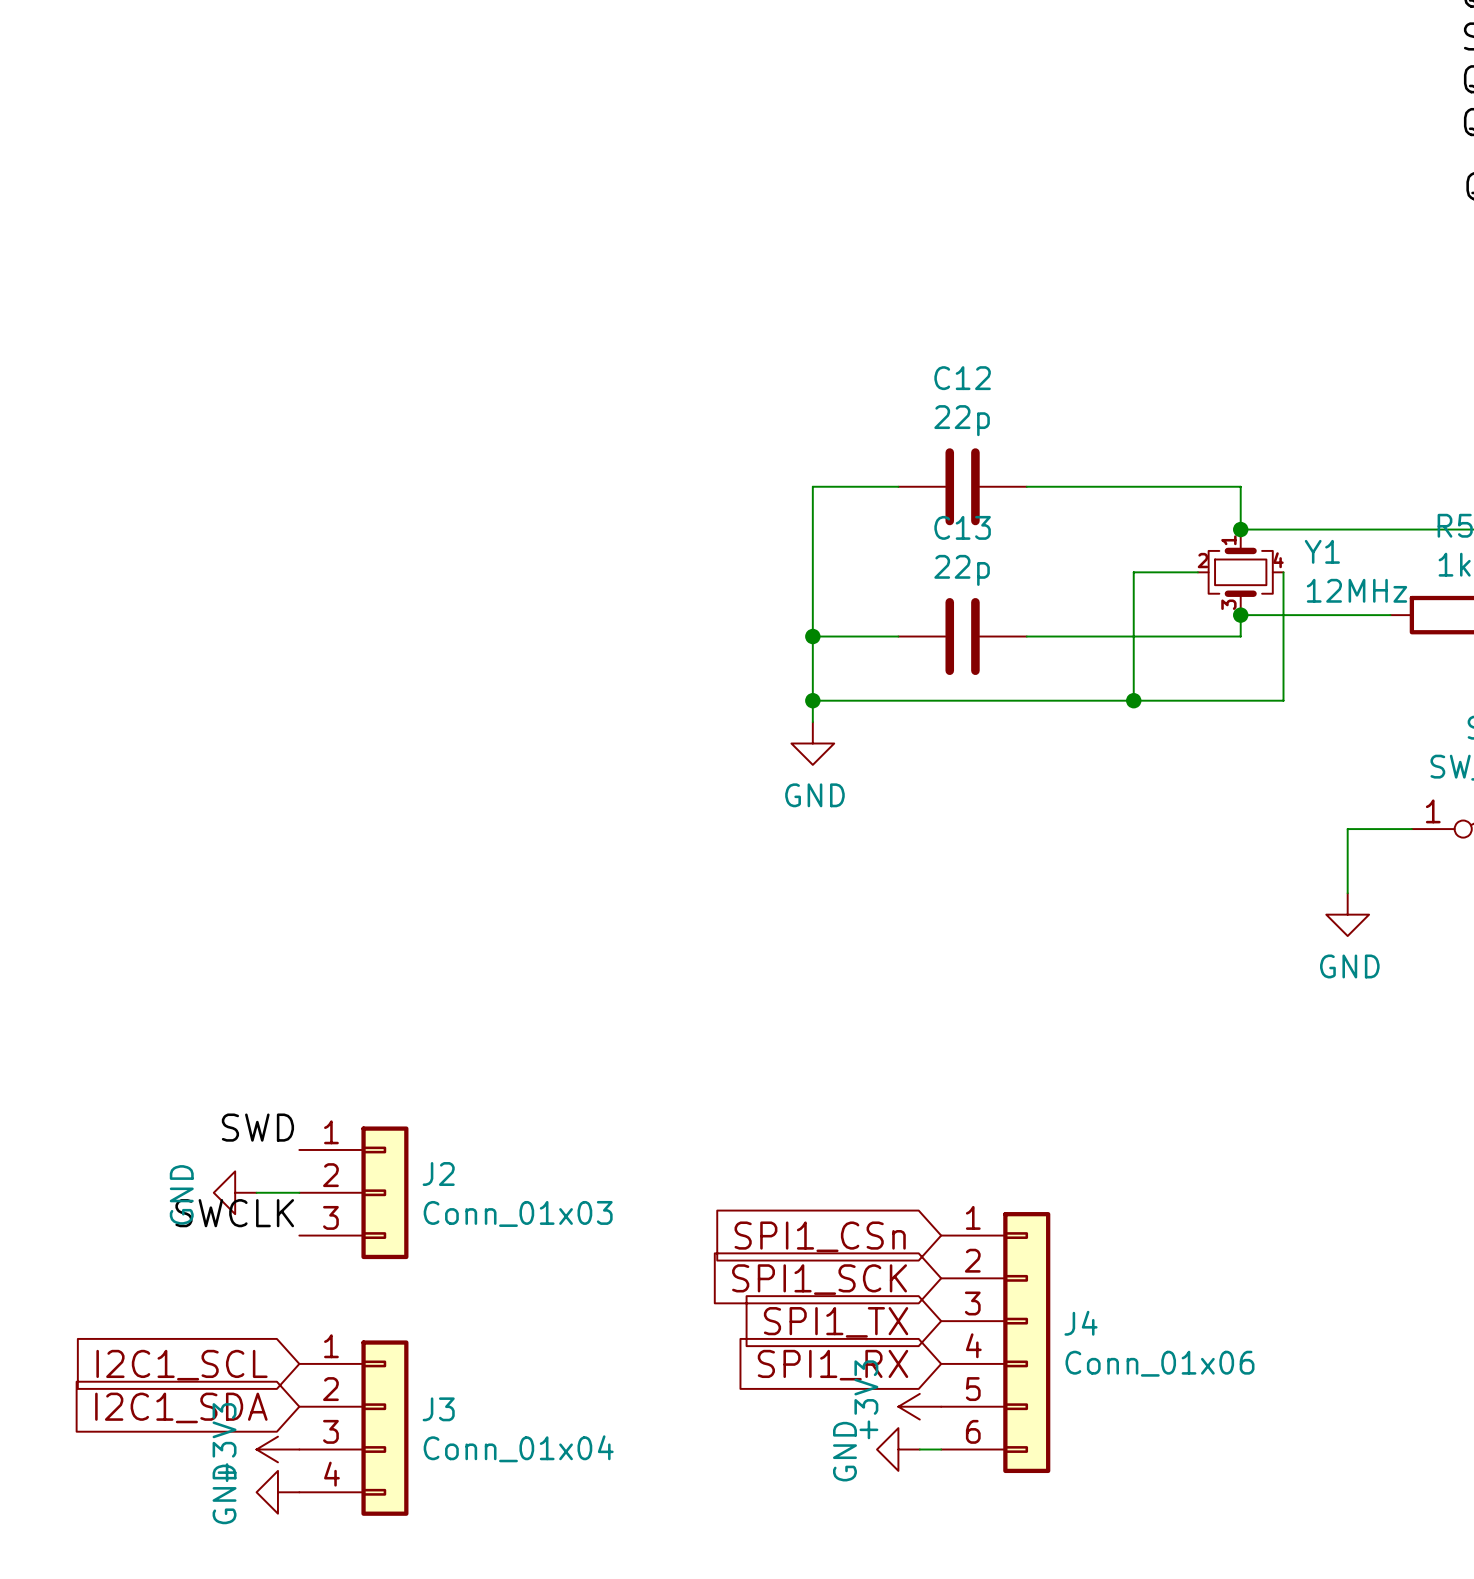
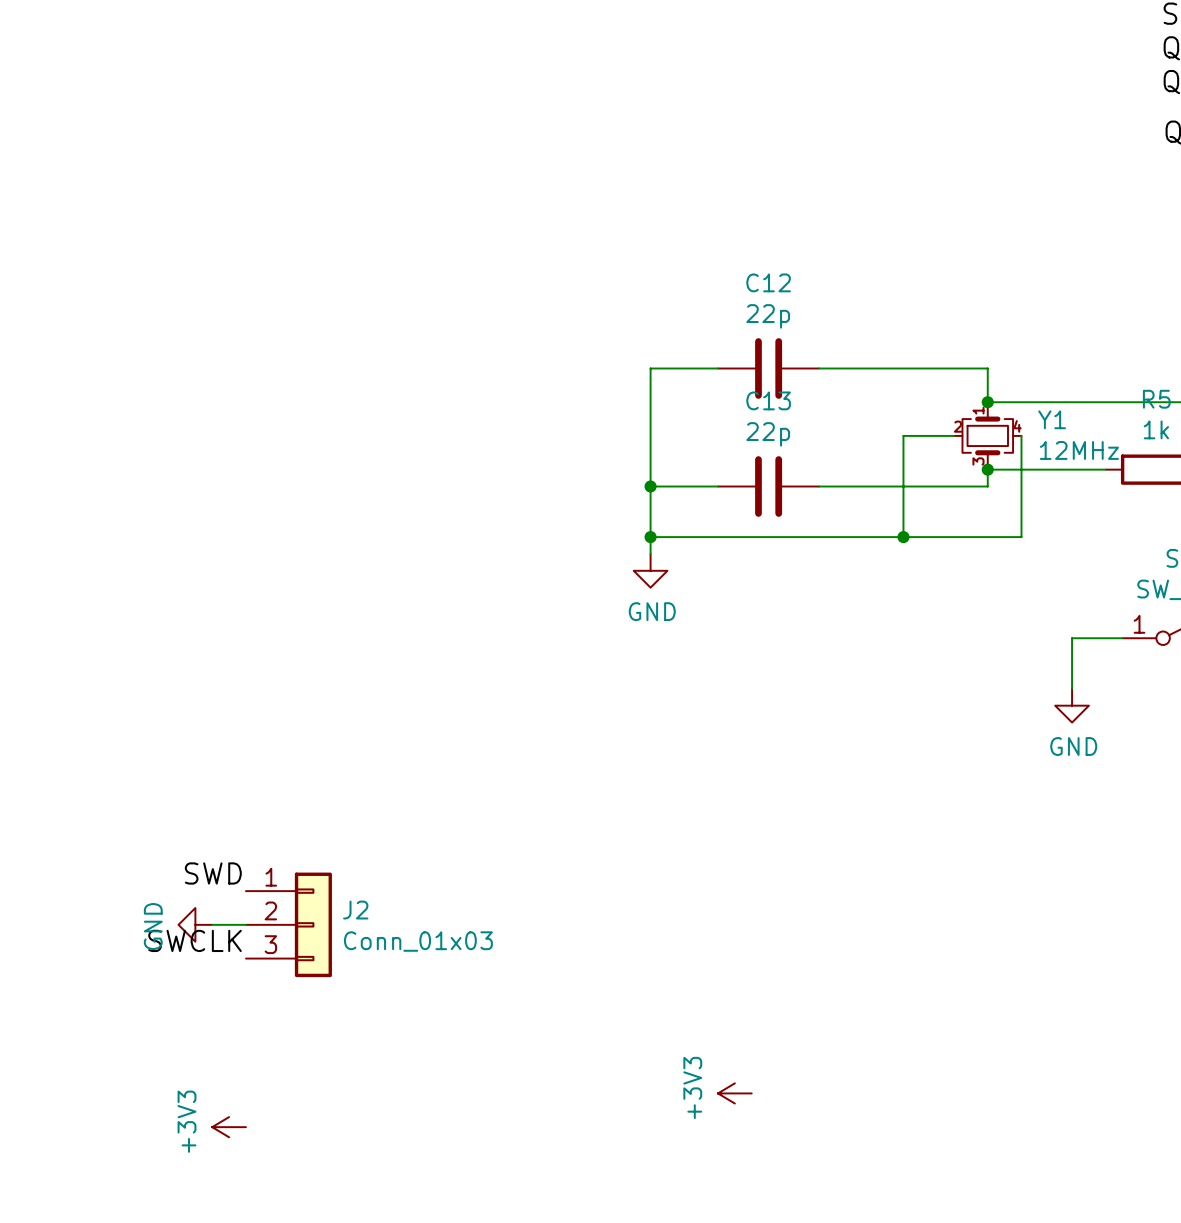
global label: SPI1_CSn (820, 1236) -> none
global label: SPI1_SCK (819, 1279) -> none
global label: SPI1_TX (836, 1322) -> none
J4: Conn_01x06 (995, 1342) -> none
global label: I2C1_SCL (181, 1365) -> none
global label: SPI1_RX (832, 1365) -> none
global label: I2C1_SDA (181, 1407) -> none
J3: Conn_01x04 (353, 1428) -> none
power symbol: GND (898, 1449) -> none
wire: (919, 1449) (941, 1449) -> none
power symbol: GND (277, 1492) -> none

